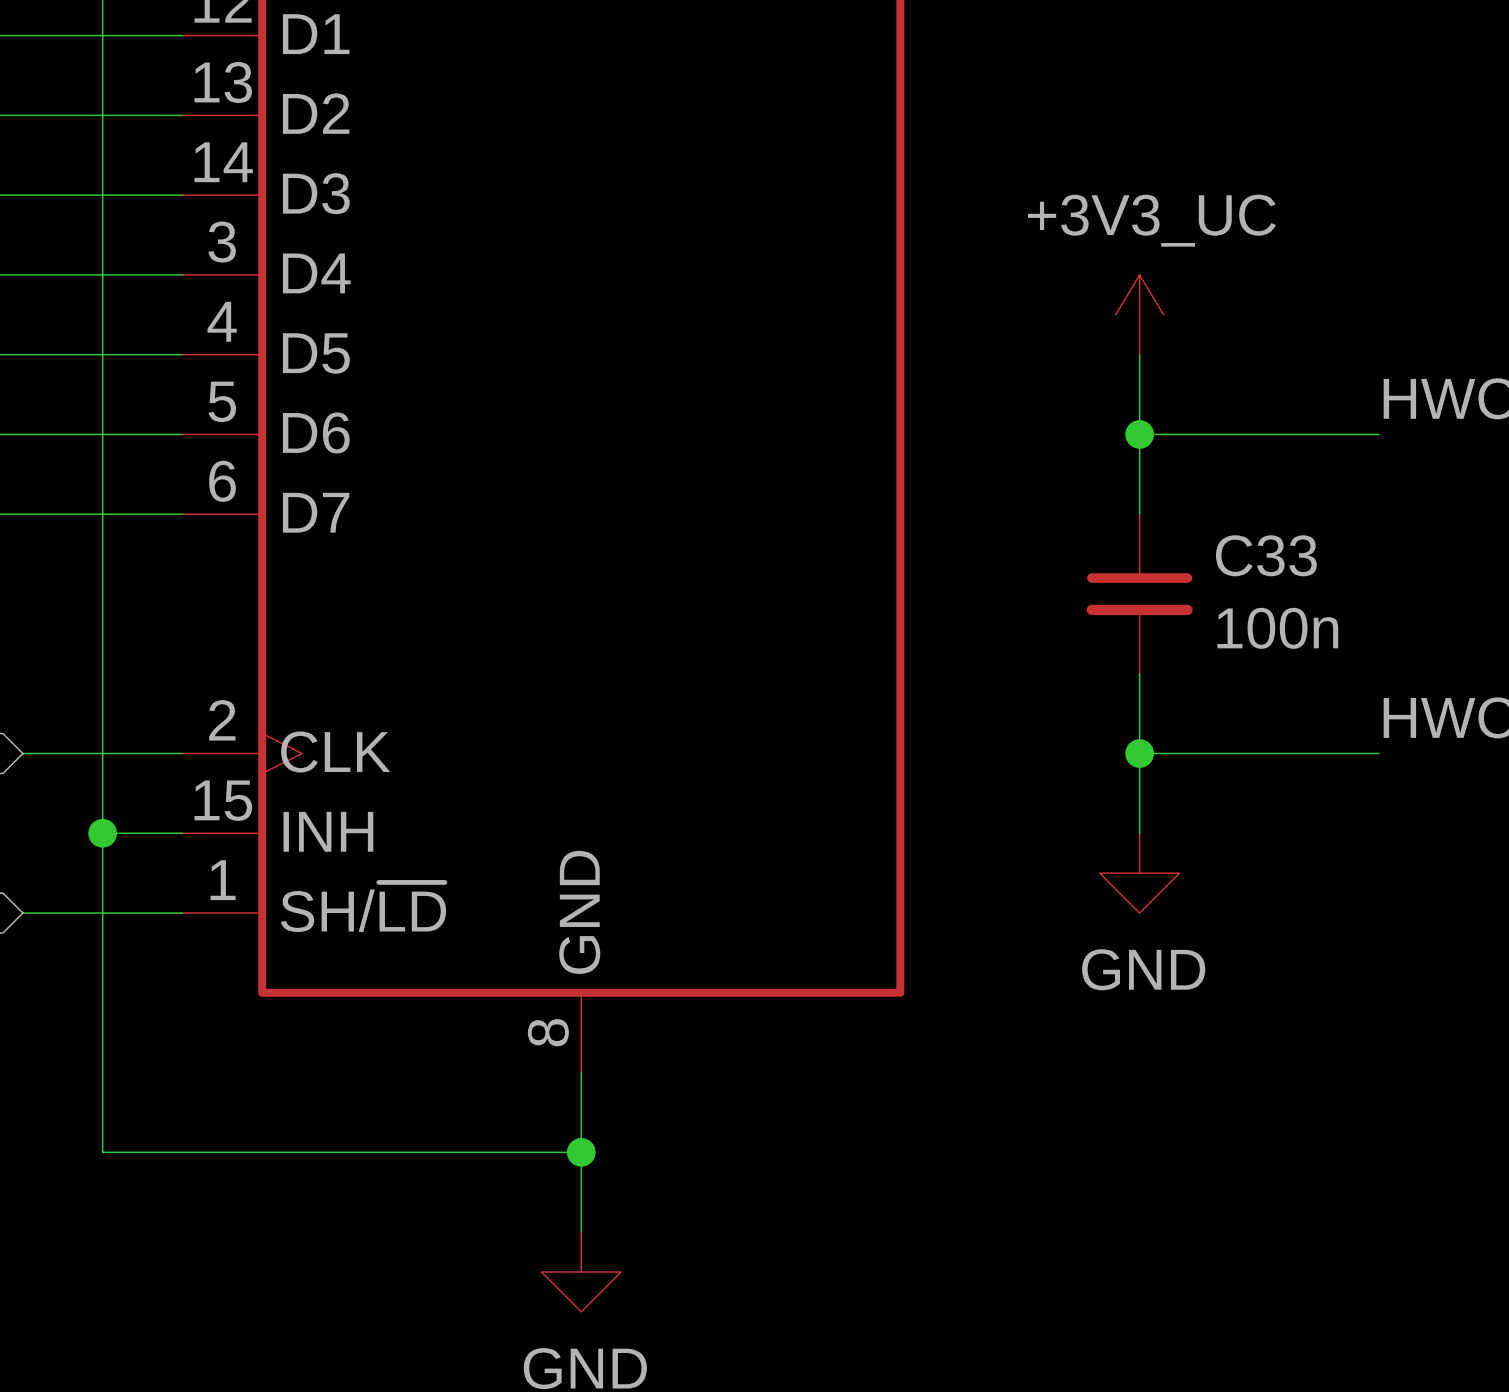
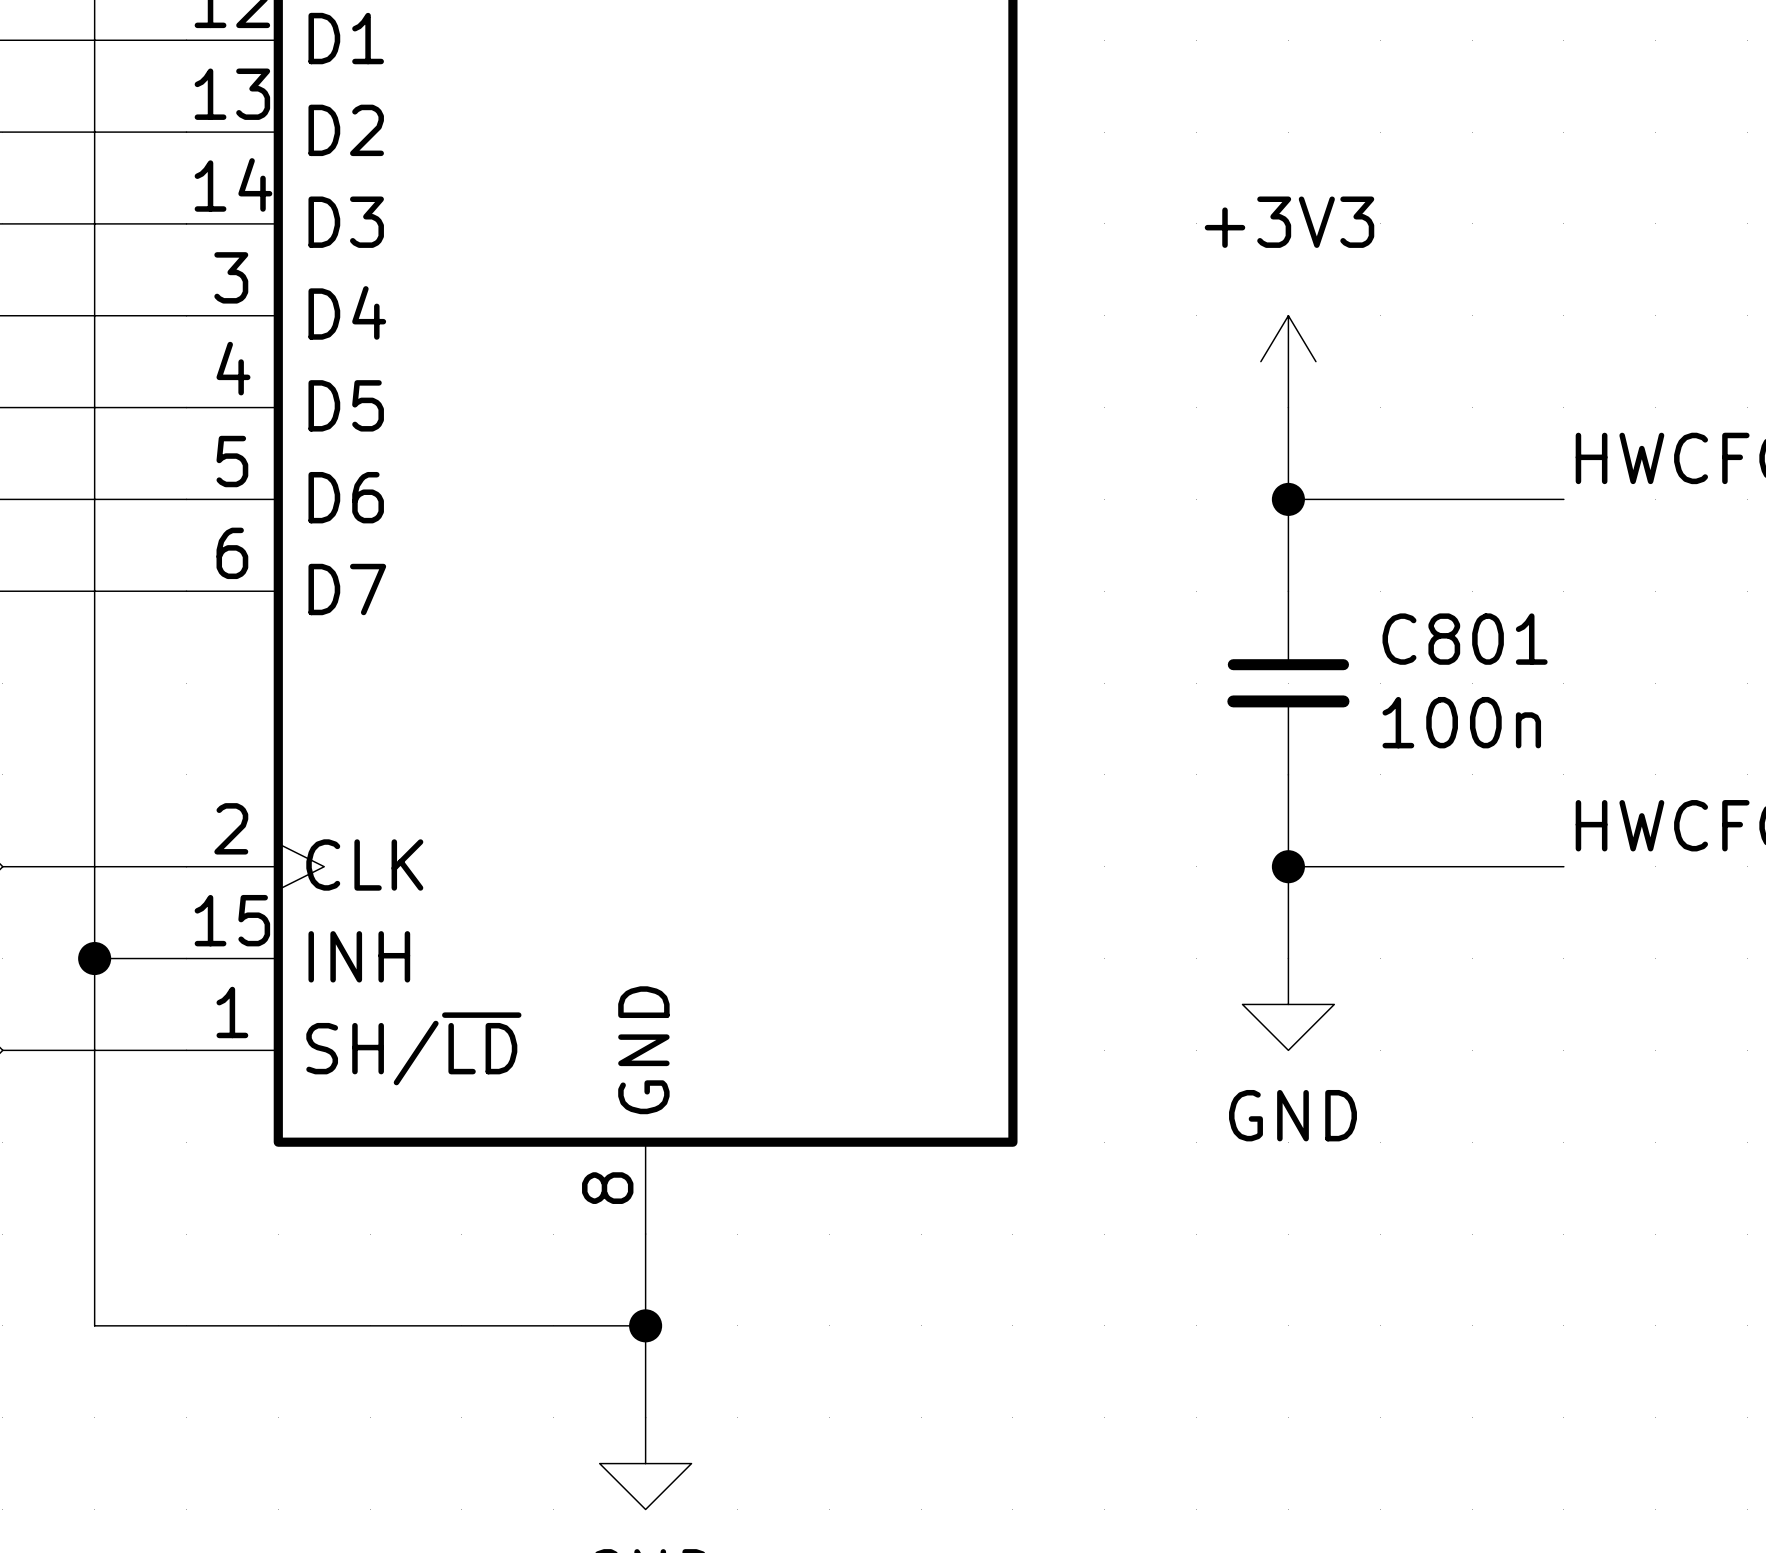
power symbol: +3V3_UC (1139, 314) -> +3V3 (1288, 361)
C33 name: C33 (1266, 555) -> C801 (1465, 639)

